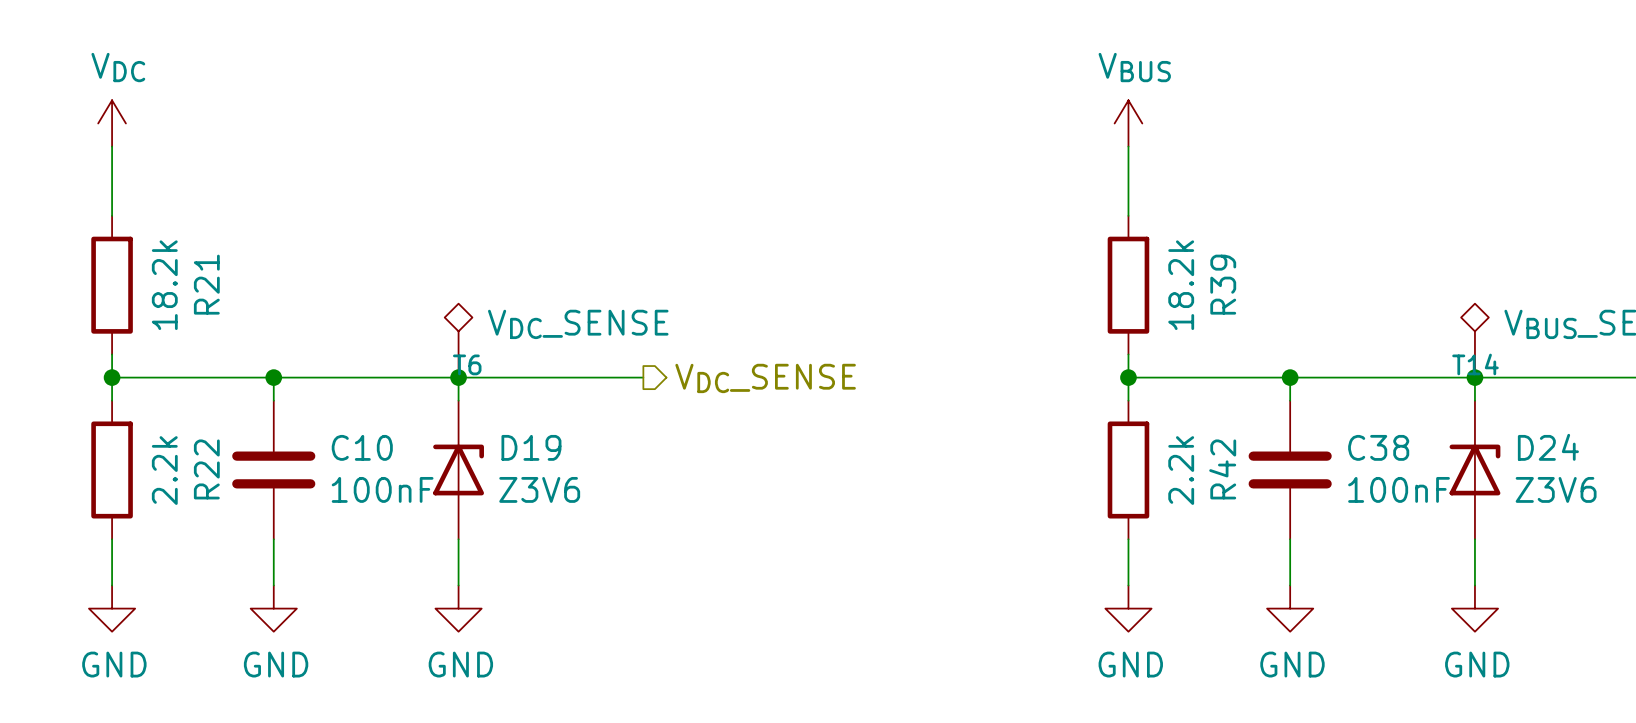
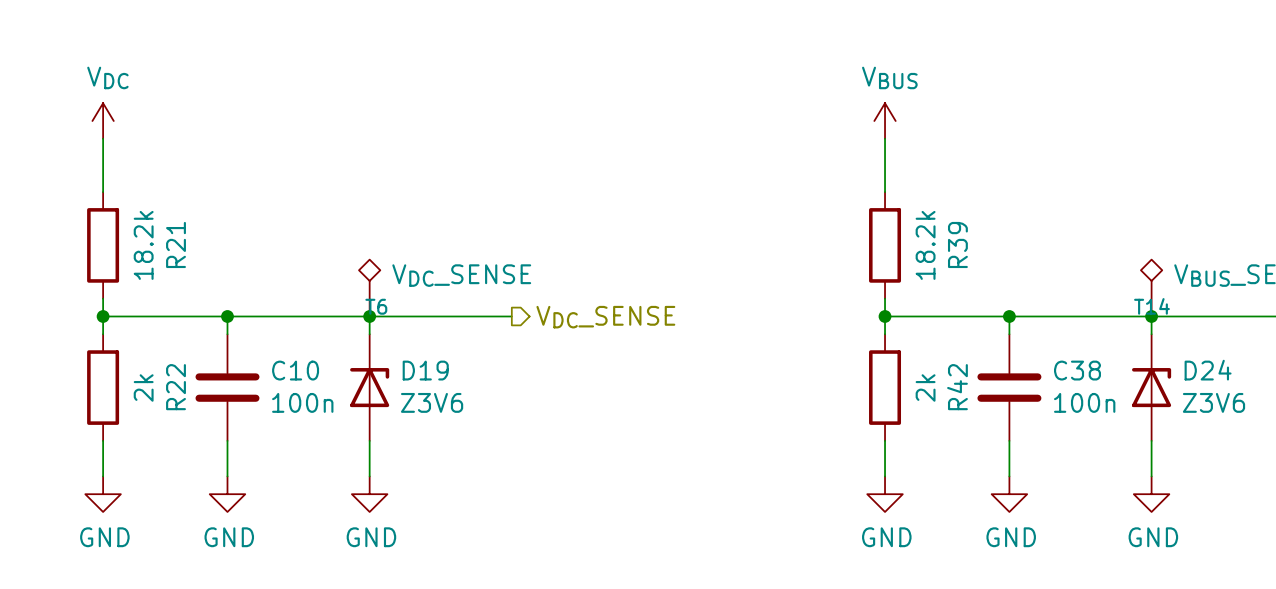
R22 value: 2.2k (164, 470) -> 2k (143, 387)
R42 value: 2.2k (1181, 470) -> 2k (925, 387)
C10 value: 100nF (382, 489) -> 100n (302, 402)
C38 value: 100nF (1399, 489) -> 100n (1084, 402)

